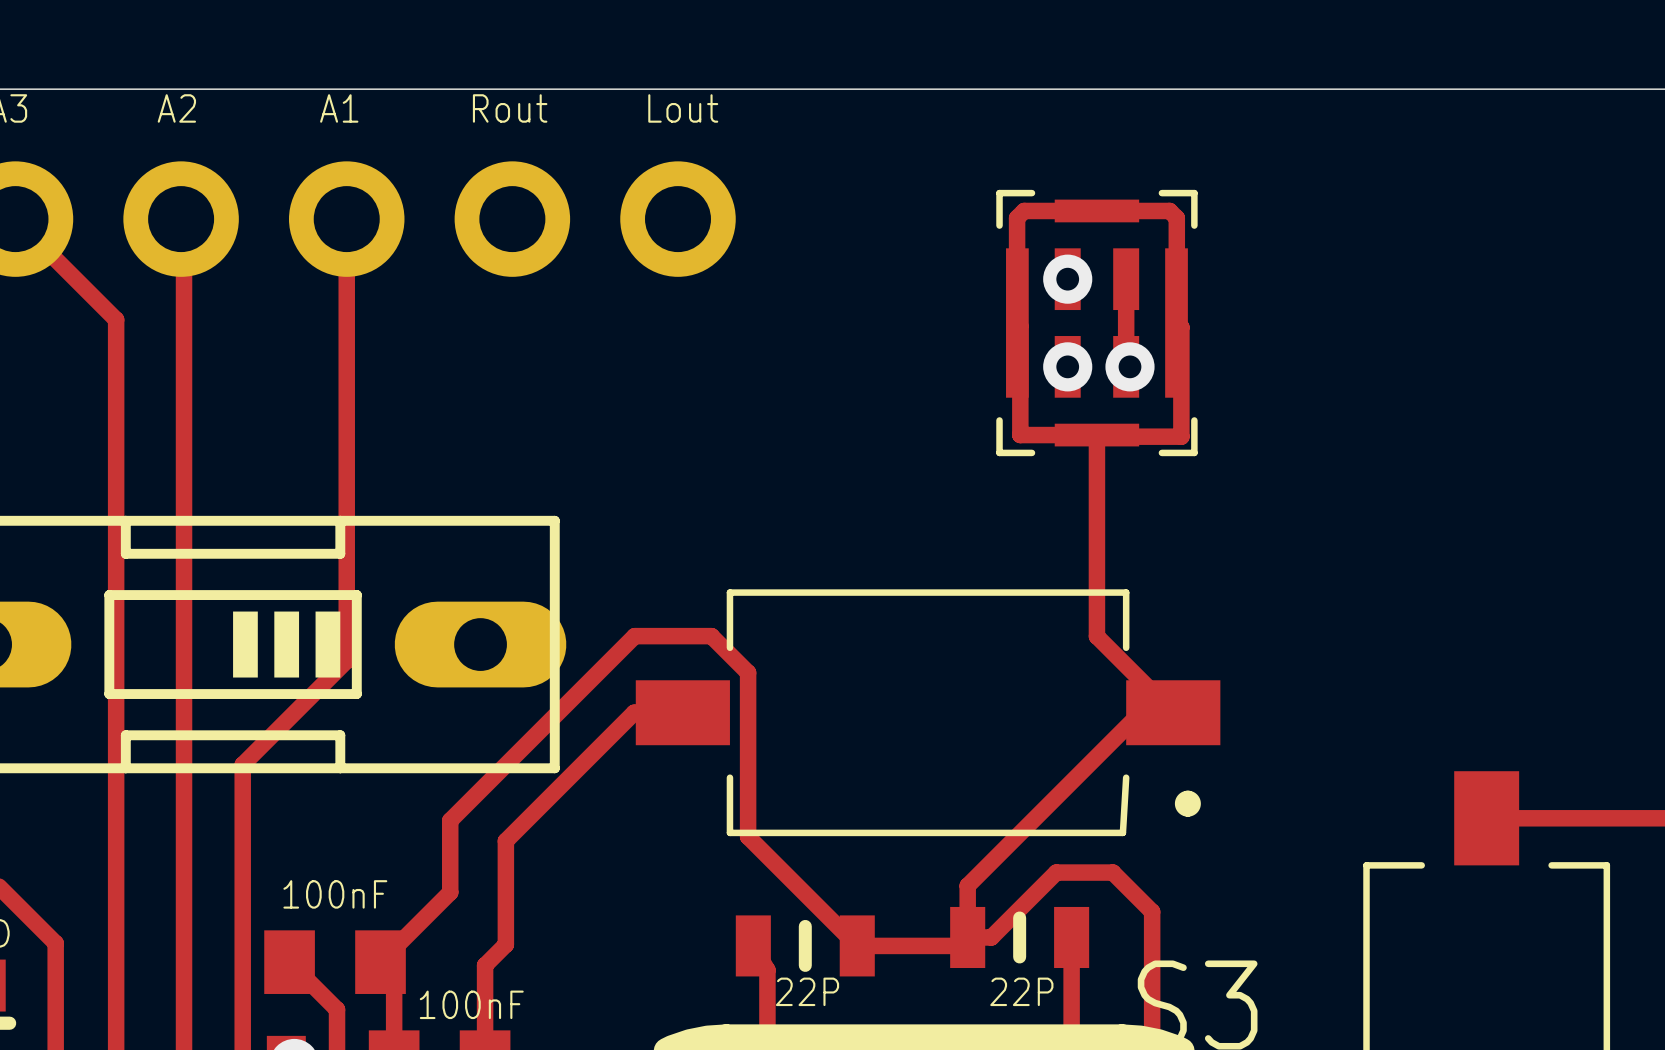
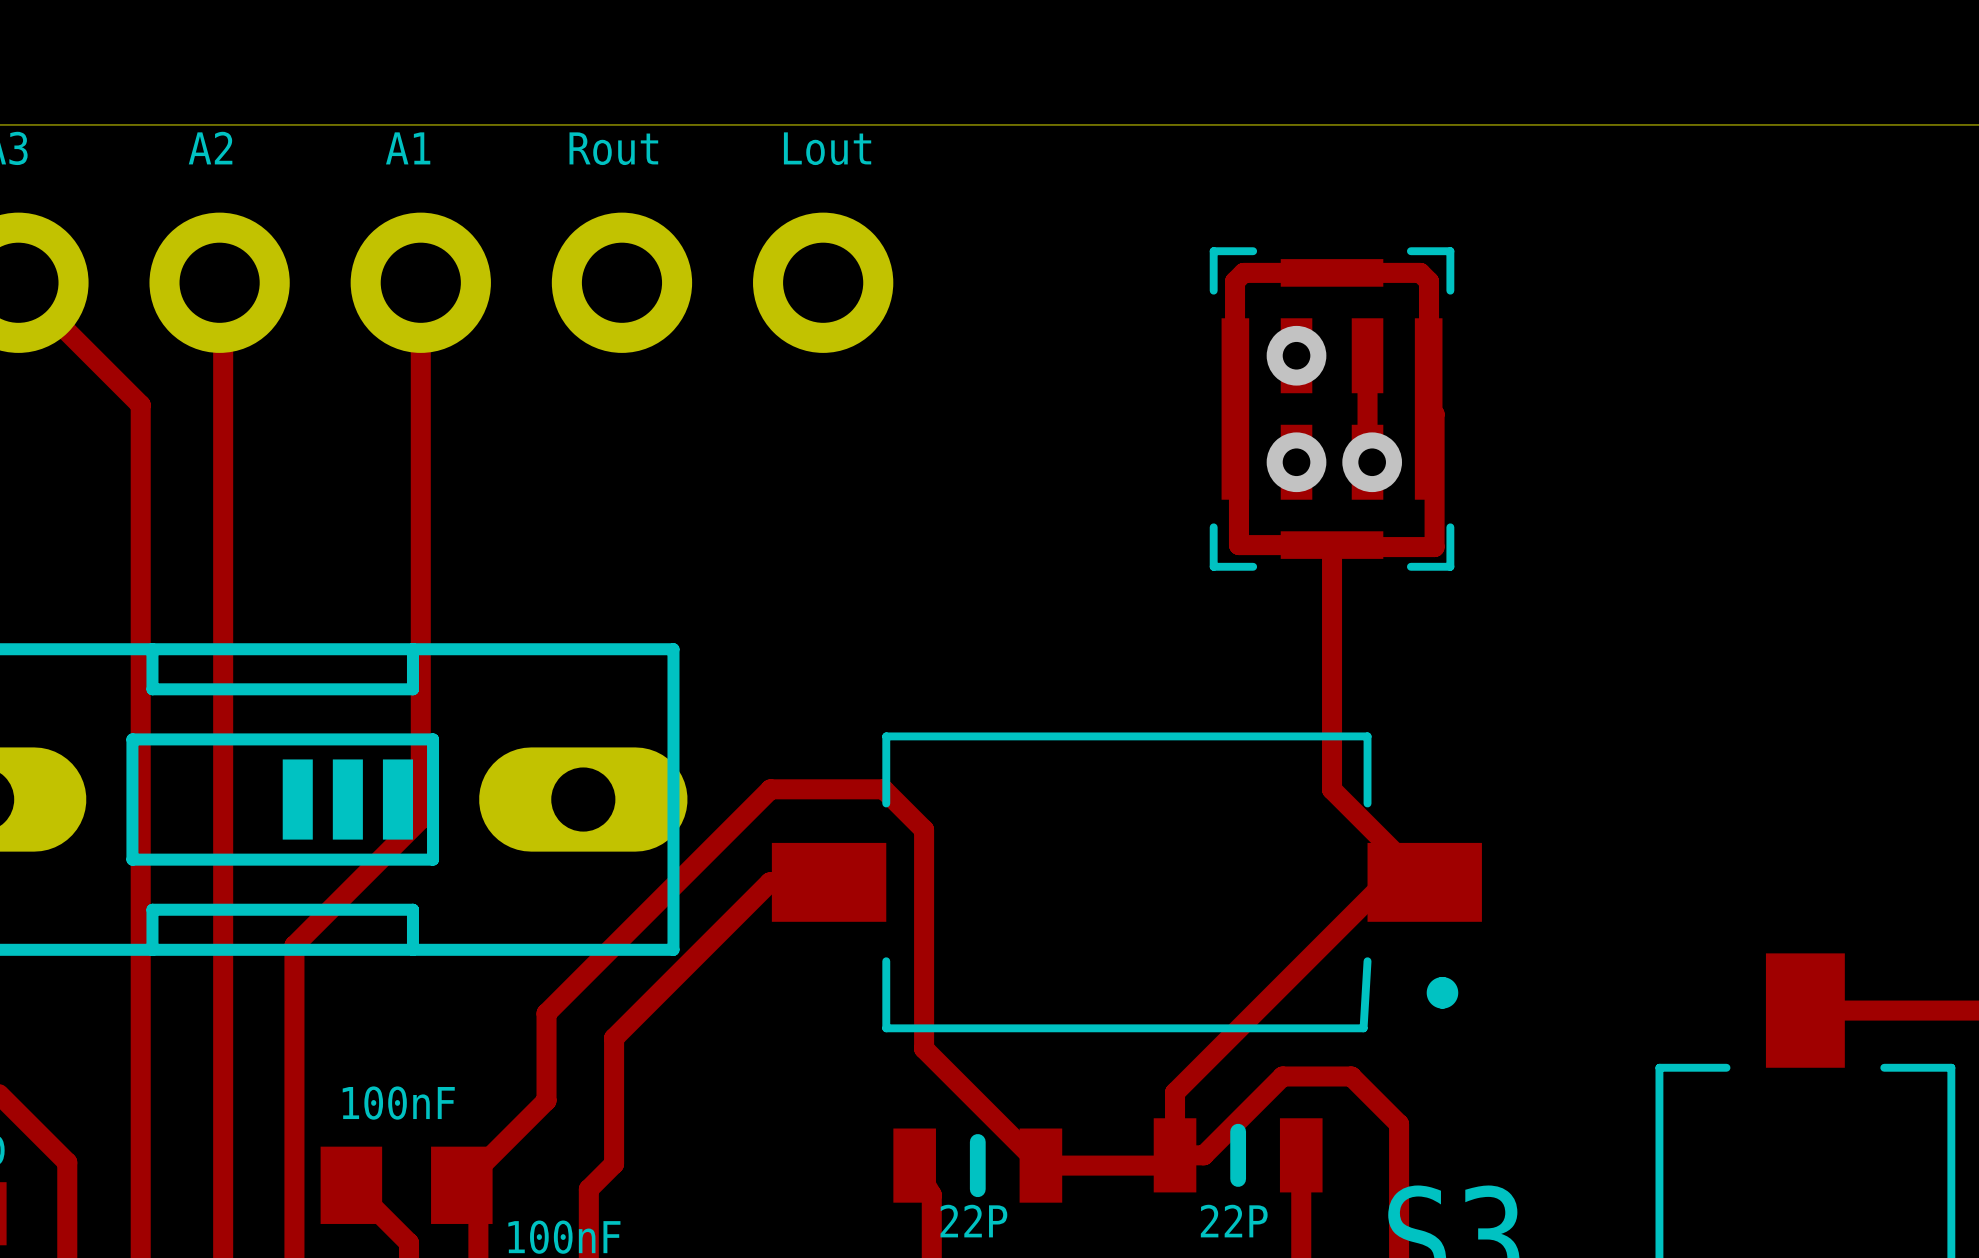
track: (711, 636) (748, 672) (748, 836) (761, 849) -> (863, 789) (883, 789) (924, 829) (924, 1048)

